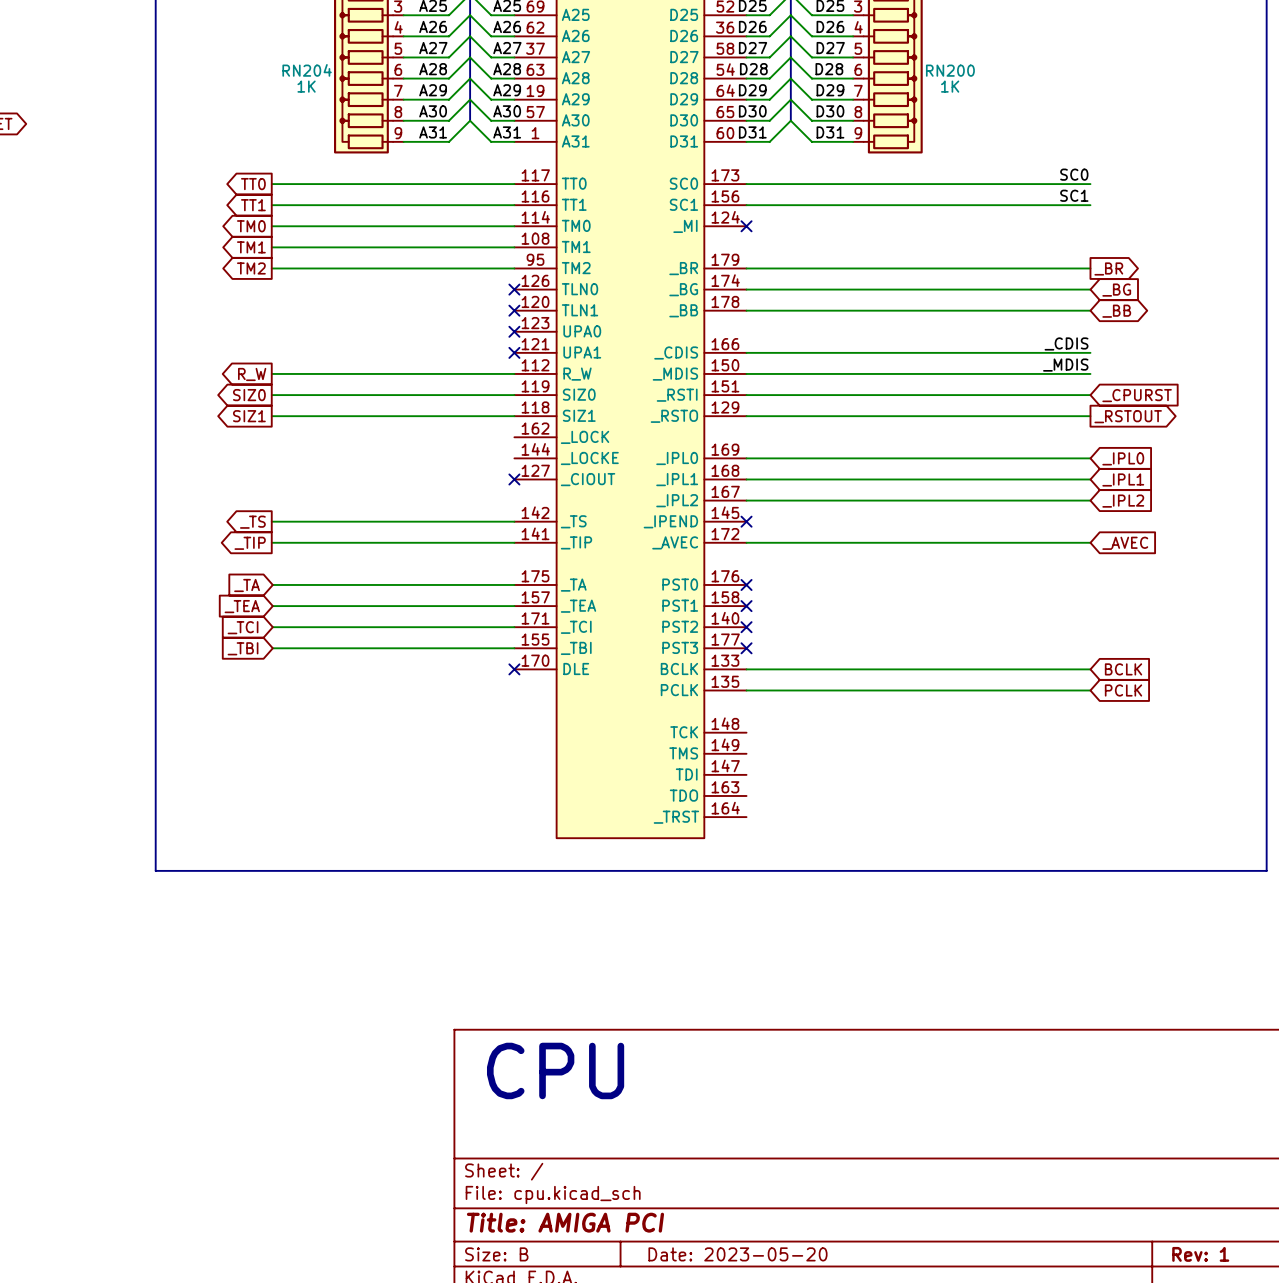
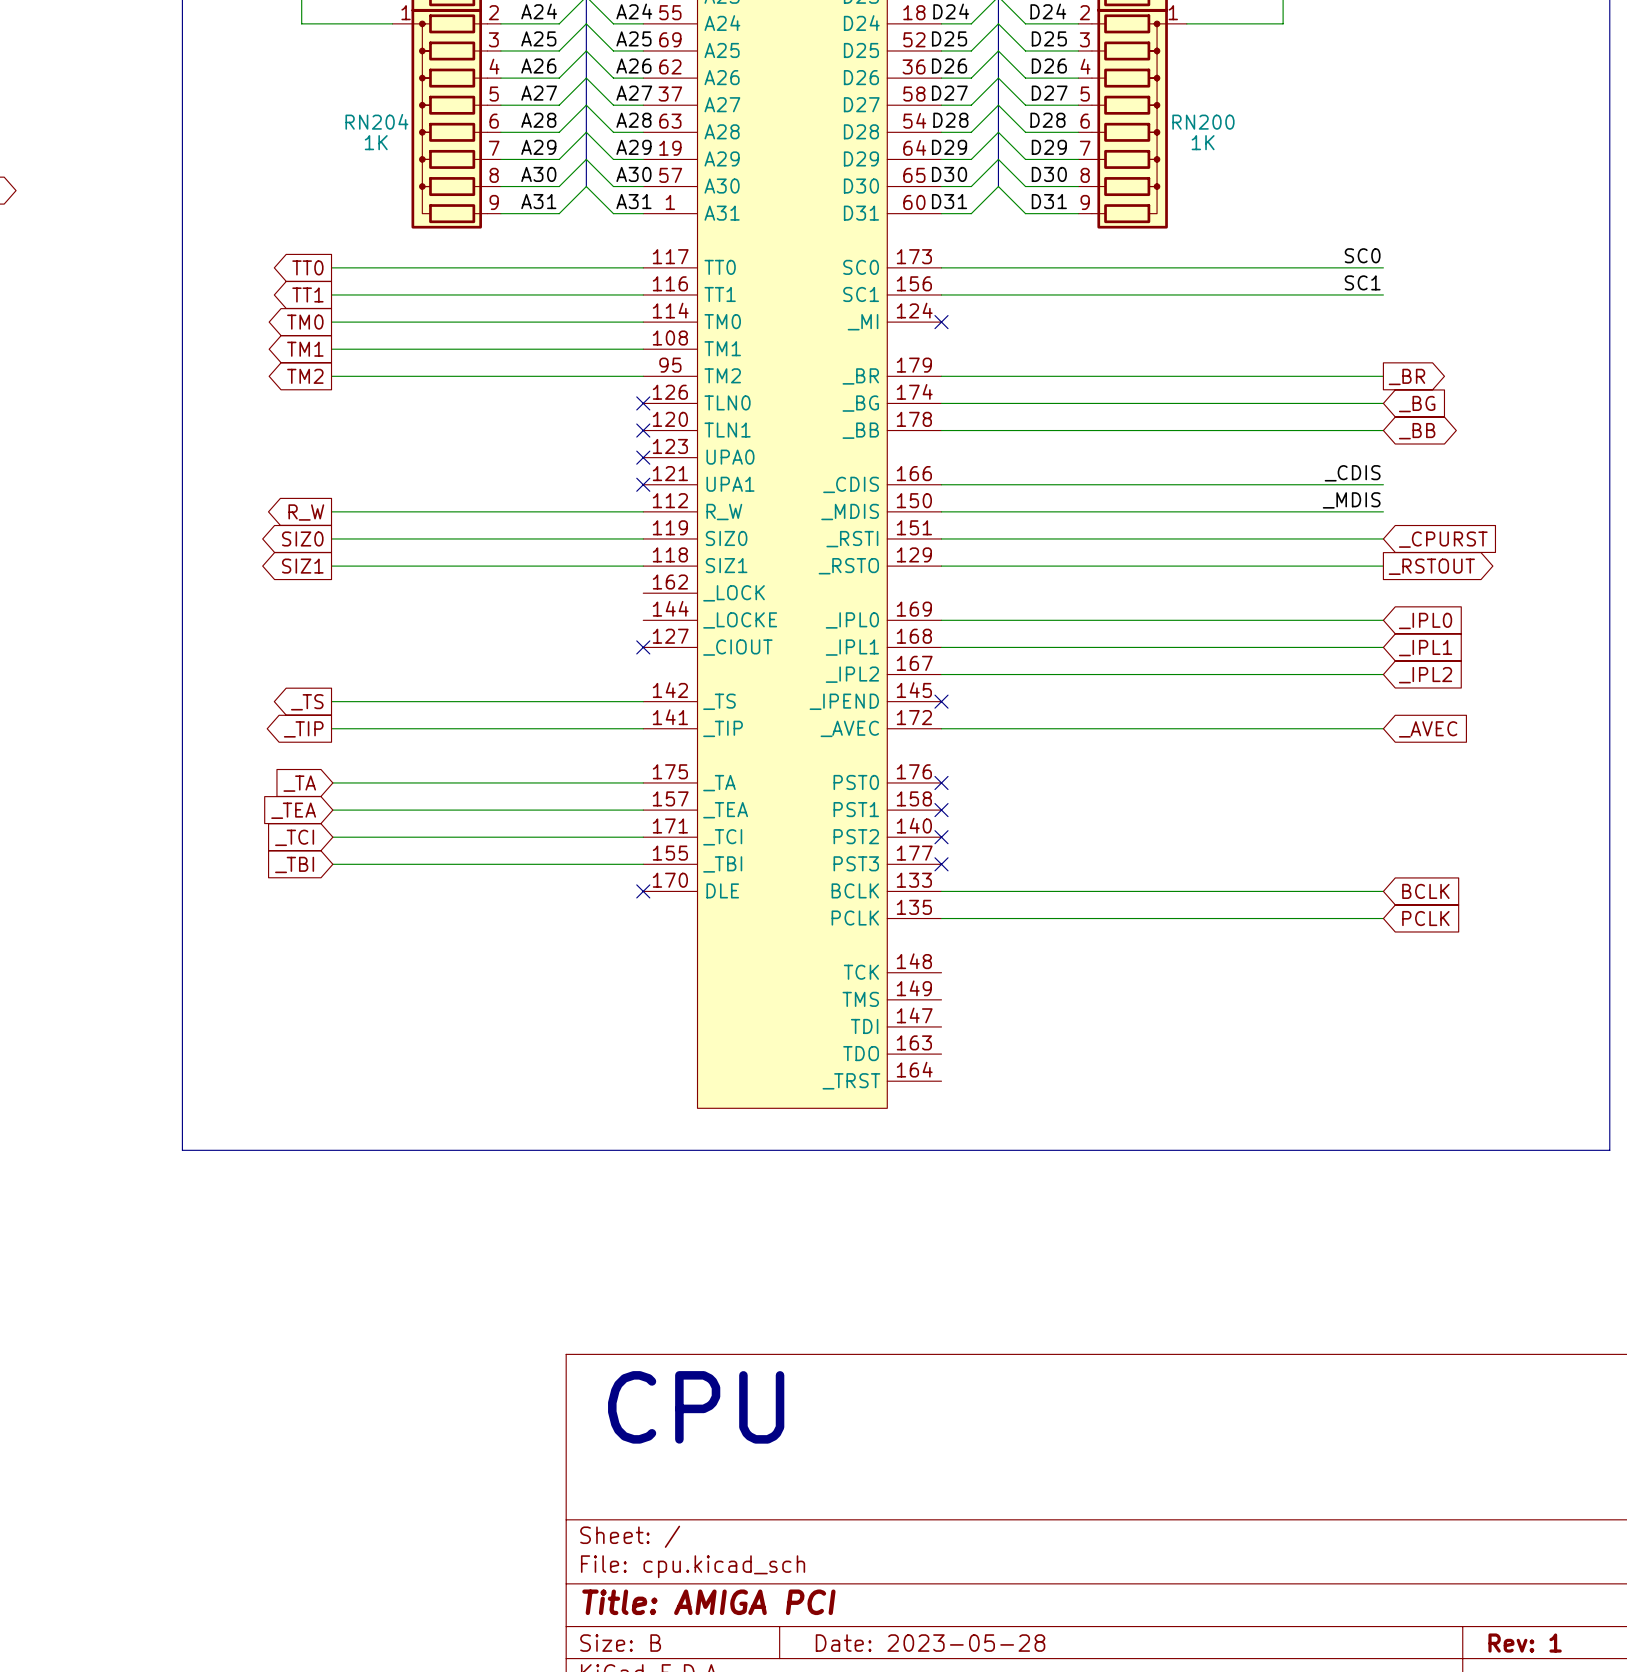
title block: Date: 2023-05-20 (737, 1254) -> Date: 2023-05-28 (930, 1643)

